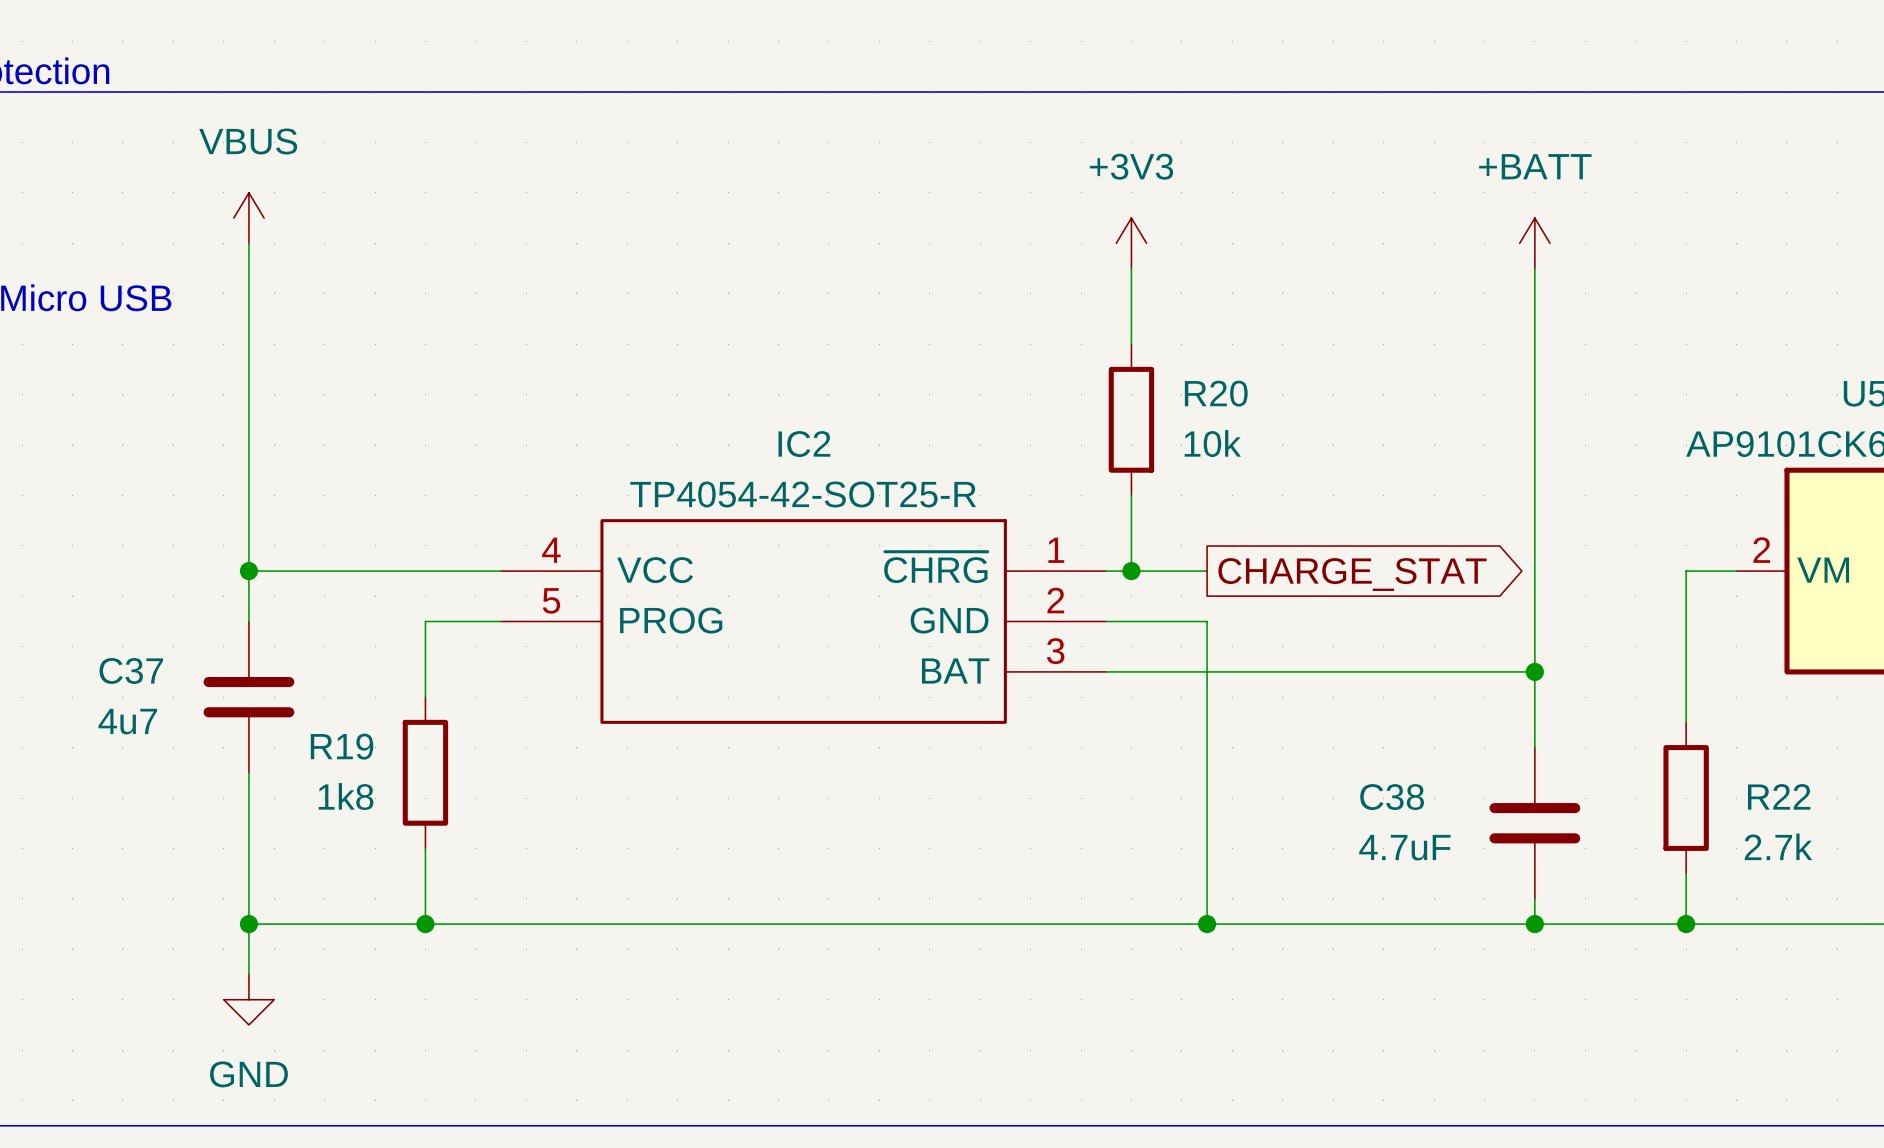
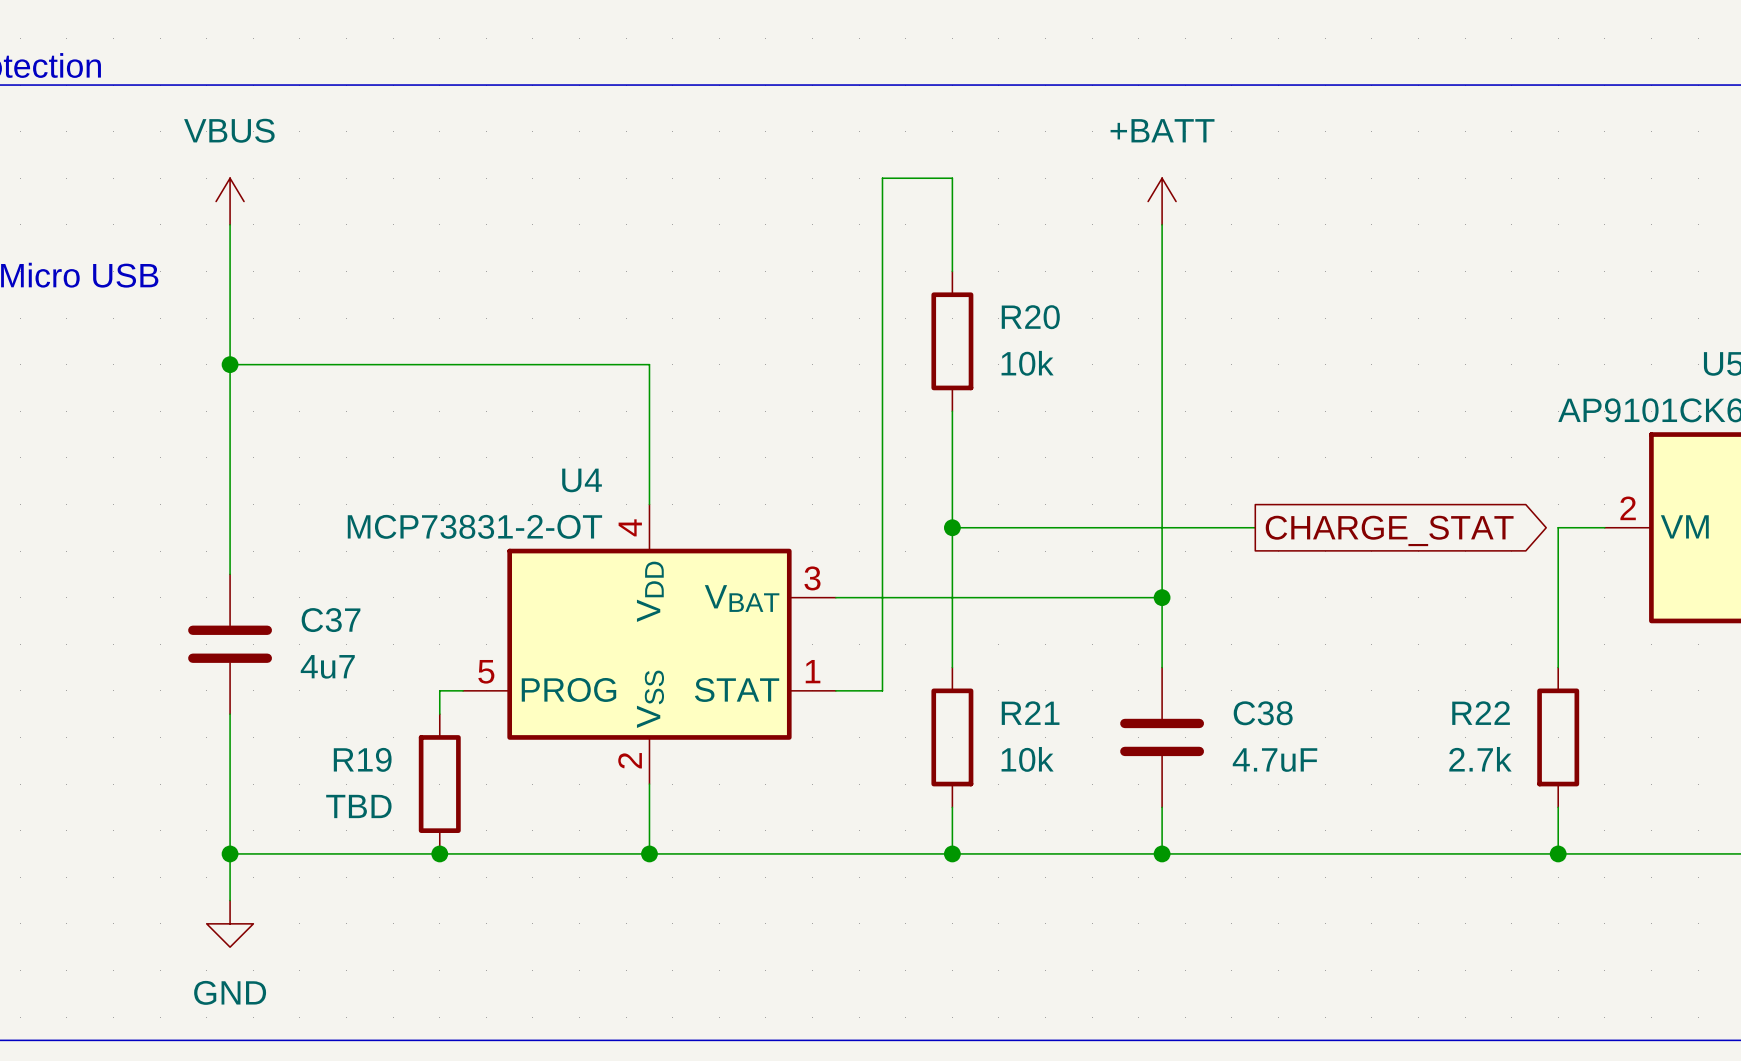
power symbol: +3V3 (1131, 243) -> none
power symbol position: +BATT (1534, 243) -> +BATT (1162, 201)
wire: (1131, 268) (1131, 344) -> none
wire: (1534, 268) (1534, 747) -> (1162, 224) (1162, 667)
wire: none -> (952, 271) (952, 178) (882, 178) (882, 690) (835, 690)
wire: none -> (230, 364) (649, 364) (649, 504)
junction: none -> (230, 364)
R20 position: (1131, 419) -> (952, 341)
wire: none -> (952, 411) (952, 667)
wire: (1131, 495) (1131, 571) -> none
wire: (248, 571) (501, 571) -> none
junction: (248, 571) -> none
junction: none -> (952, 527)
junction: (1131, 571) -> none
wire: none -> (1115, 527) (1255, 527)
global label position: CHARGE_STAT (1352, 574) -> CHARGE_STAT (1389, 530)
wire: (501, 621) (425, 621) (425, 697) -> none
IC2: TP4054-42-SOT25-R (803, 621) -> none
wire: (1106, 621) (1207, 621) (1207, 924) -> none
wire: none -> (835, 597) (1162, 597)
junction: none -> (1162, 597)
C37 name position: C37 (131, 670) -> C37 (331, 620)
wire: (1106, 671) (1534, 671) -> none
junction: (1534, 671) -> none
U4: none -> MCP73831-2-OT (649, 644)
C37 value position: 4u7 (127, 721) -> 4u7 (327, 666)
wire: none -> (463, 690) (439, 690) (439, 714)
R19 position: (425, 772) -> (439, 784)
R19 value: 1k8 (346, 796) -> TBD (358, 806)
R22 name position: R22 (1779, 796) -> R22 (1481, 713)
C38 name position: C38 (1392, 797) -> C38 (1263, 713)
R21: none -> 10k (952, 737)
C38 position: (1534, 823) -> (1162, 737)
R22 value position: 2.7k (1778, 846) -> 2.7k (1480, 759)
C38 value position: 4.7uF (1404, 847) -> 4.7uF (1275, 760)
wire: (425, 848) (425, 924) -> (649, 784) (649, 853)
wire: none -> (952, 807) (952, 853)
wire: none -> (1162, 807) (1162, 853)
wire: (1534, 898) (1534, 924) -> none
junction position: (425, 924) -> (439, 853)
junction: none -> (649, 853)
junction: none -> (952, 853)
junction position: (1207, 924) -> (1162, 853)
junction: (1534, 924) -> none

